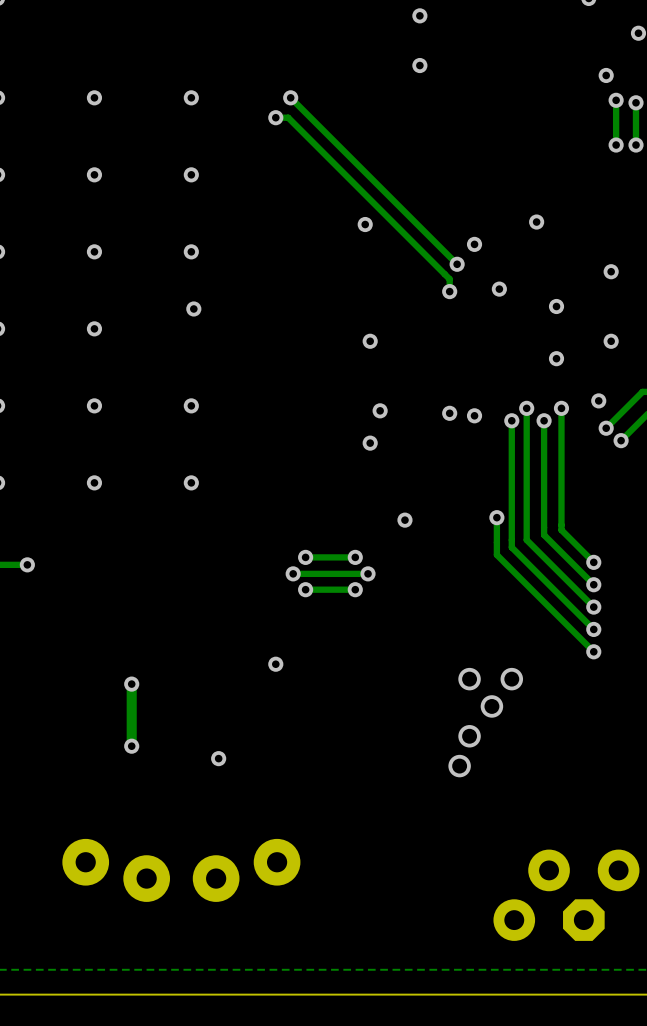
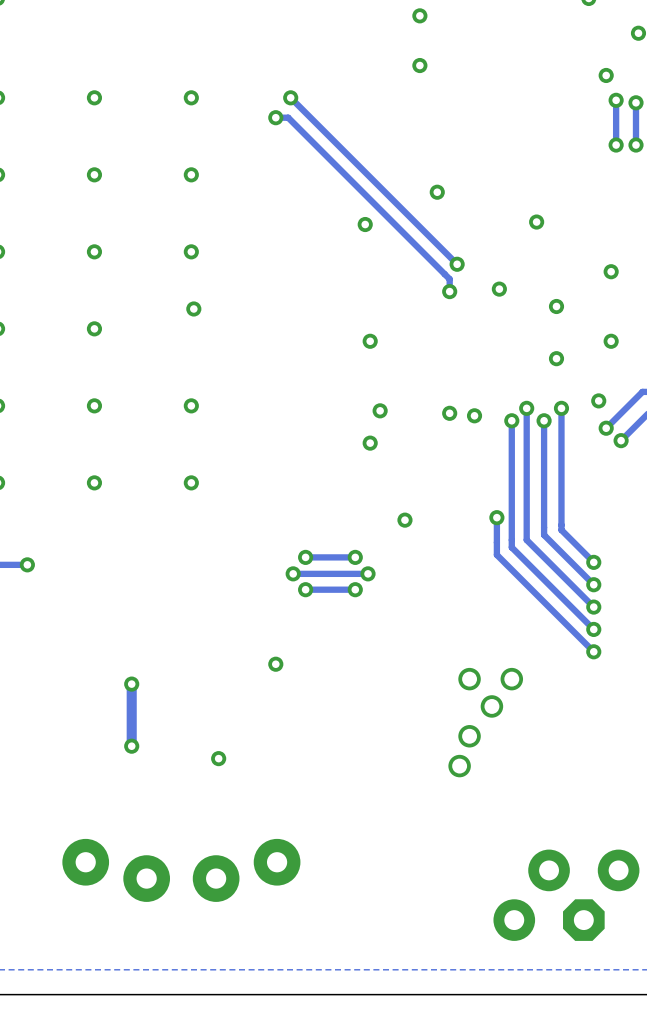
via position: (474, 244) -> (437, 192)

